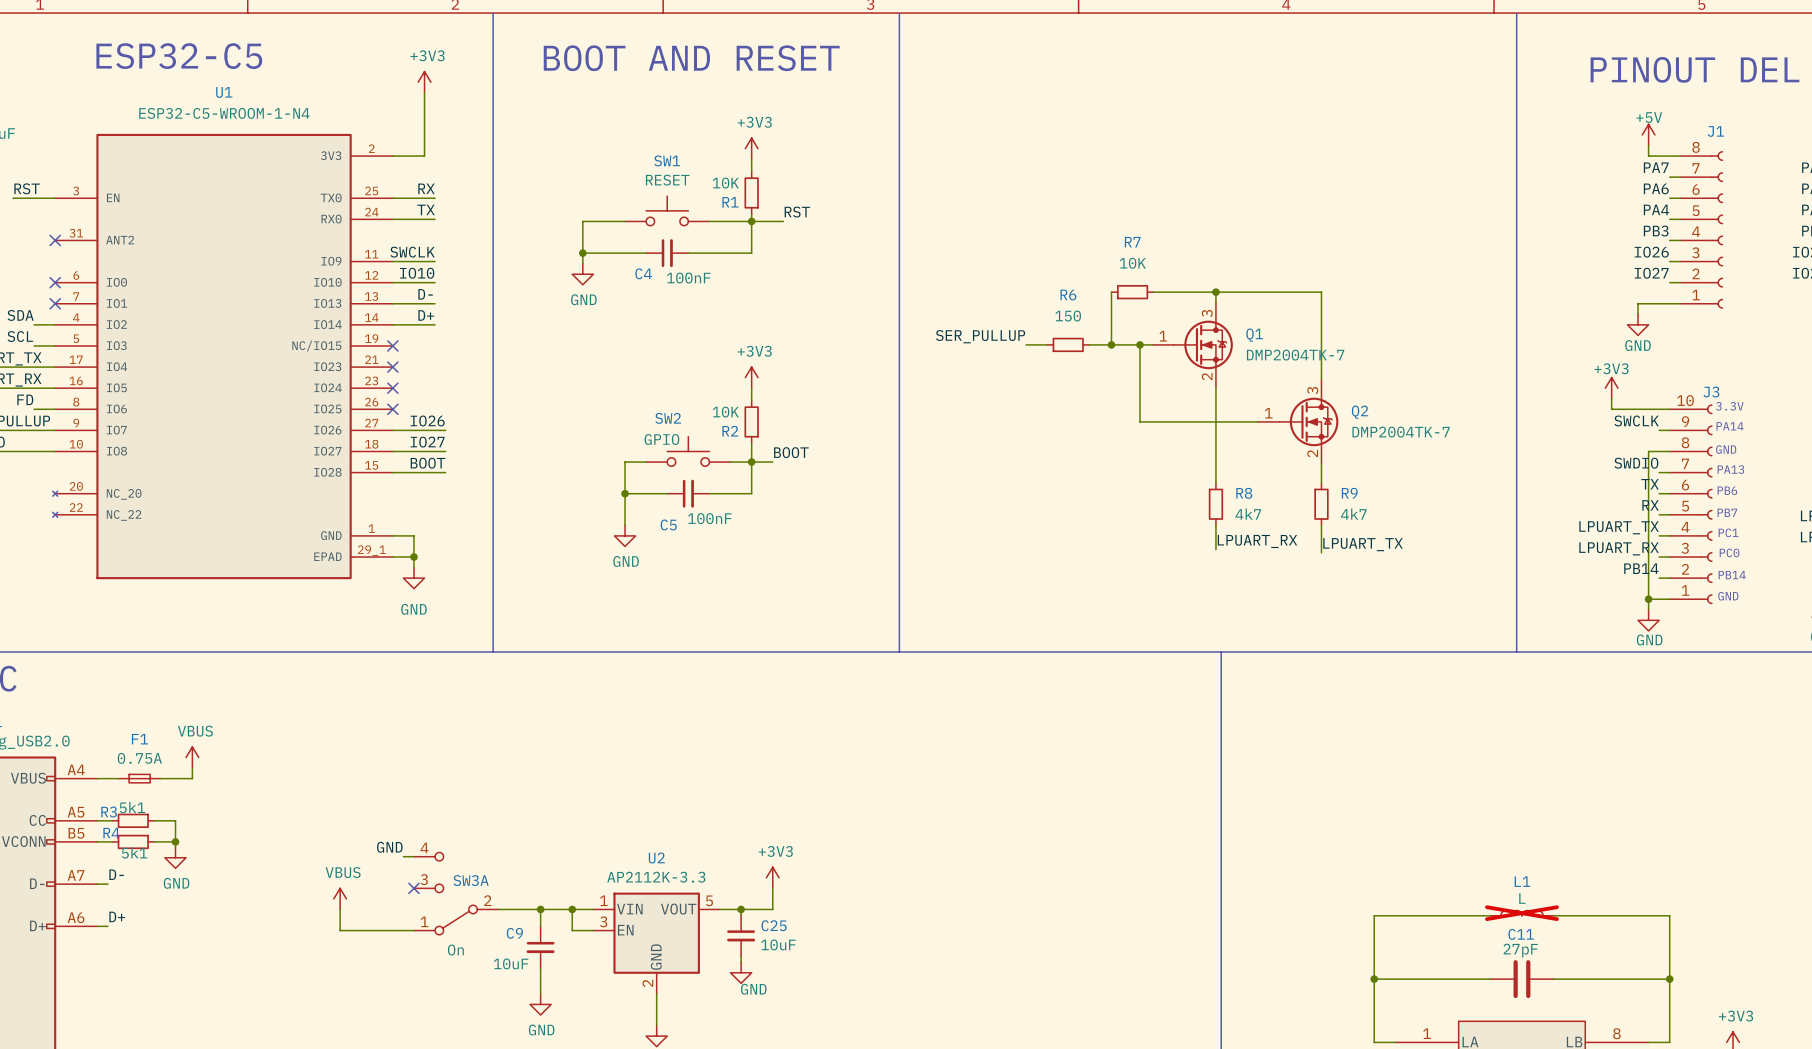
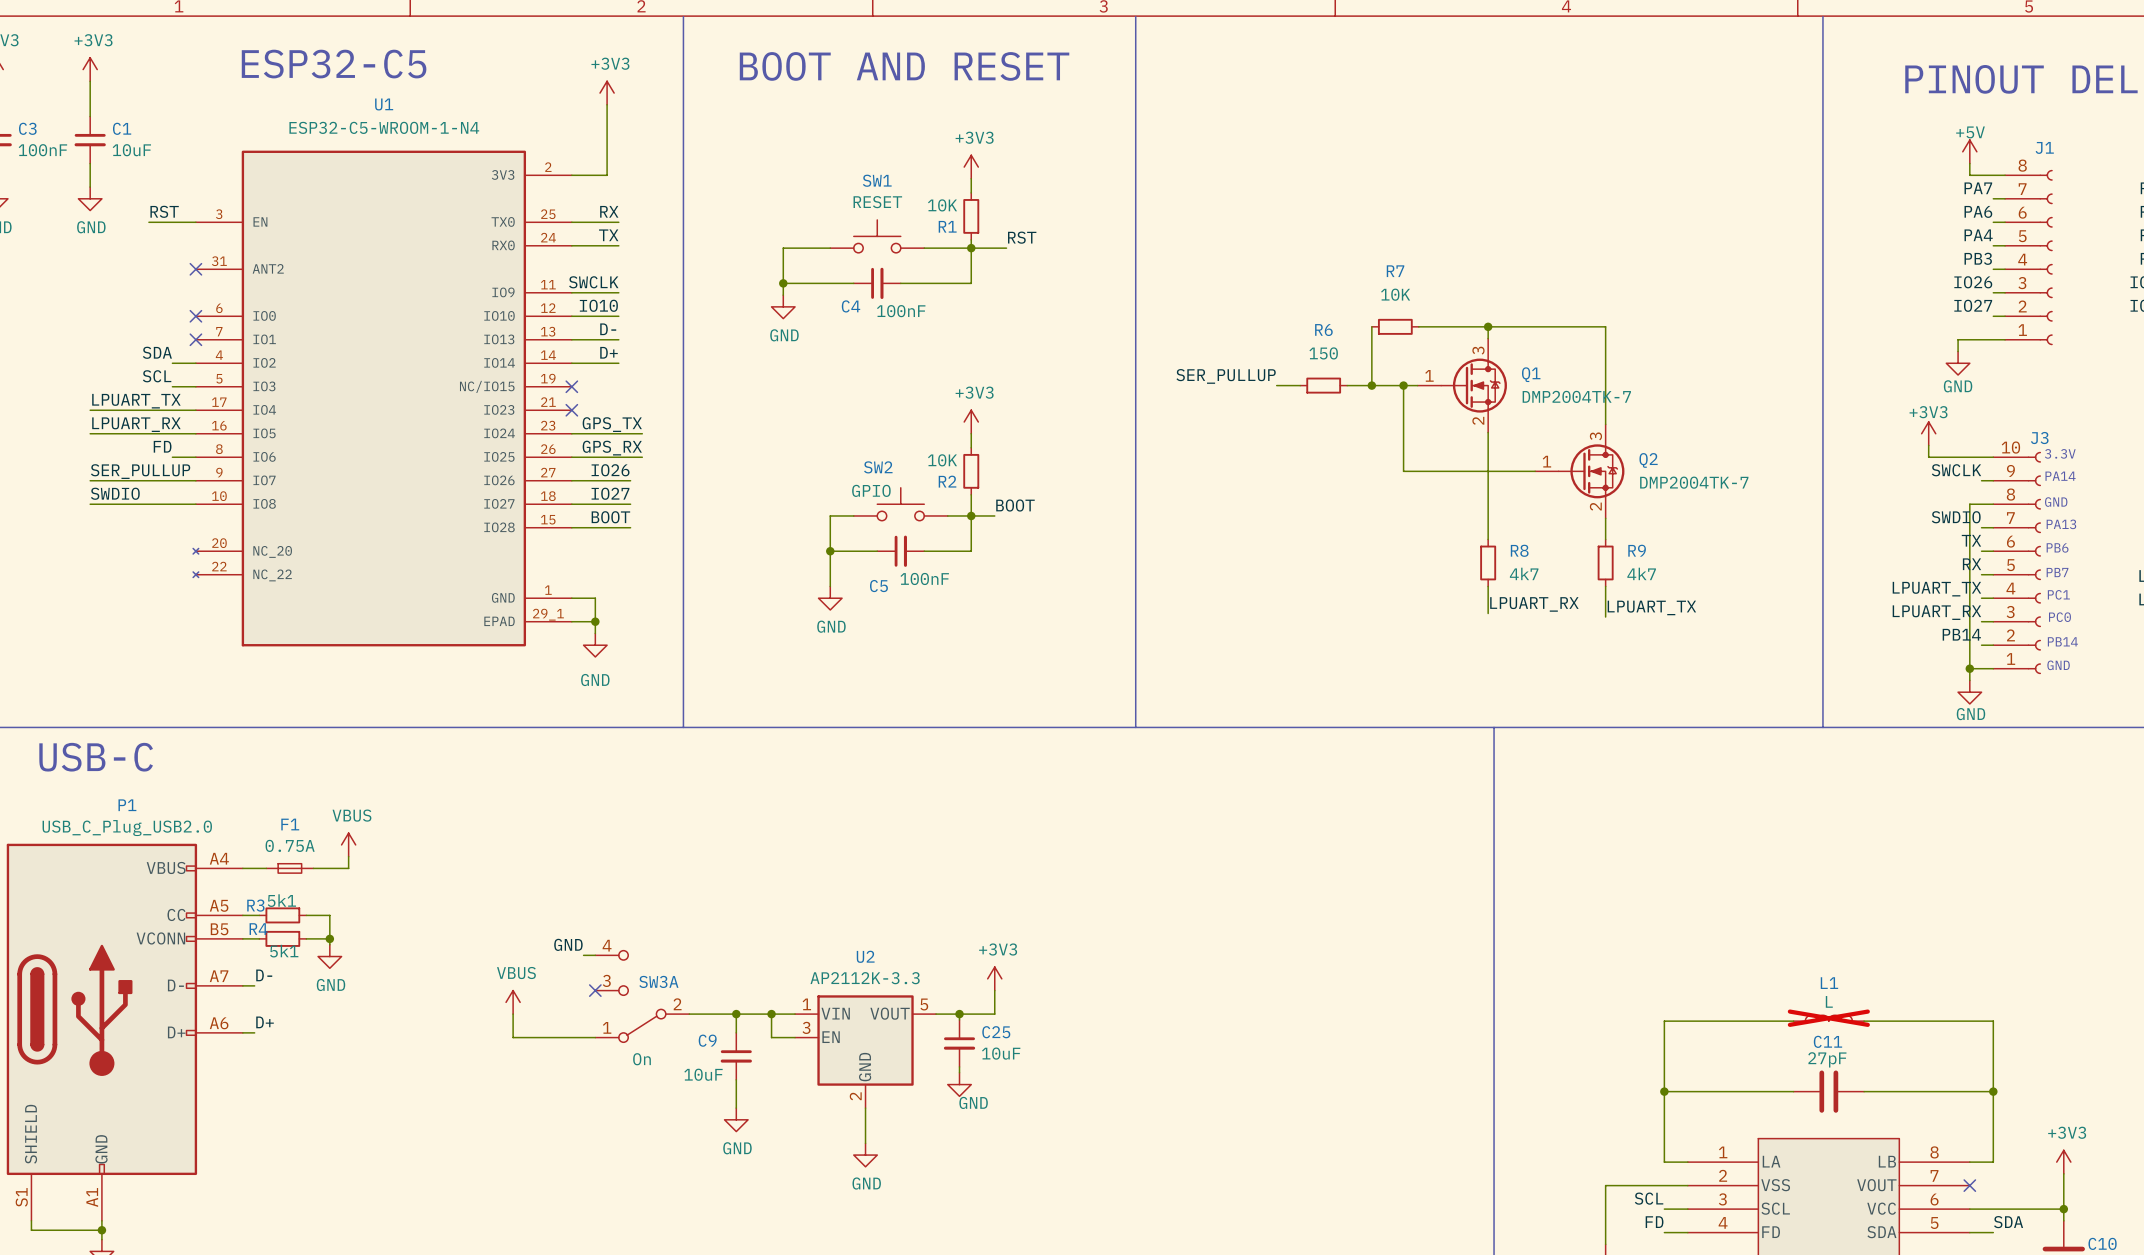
label: none -> GPS_TX (612, 424)
wire: none -> (571, 433) (642, 433)
no-connect mark: (392, 388) -> none
label: none -> GPS_RX (612, 448)
wire: none -> (571, 457) (642, 457)
no-connect mark: (392, 409) -> none

